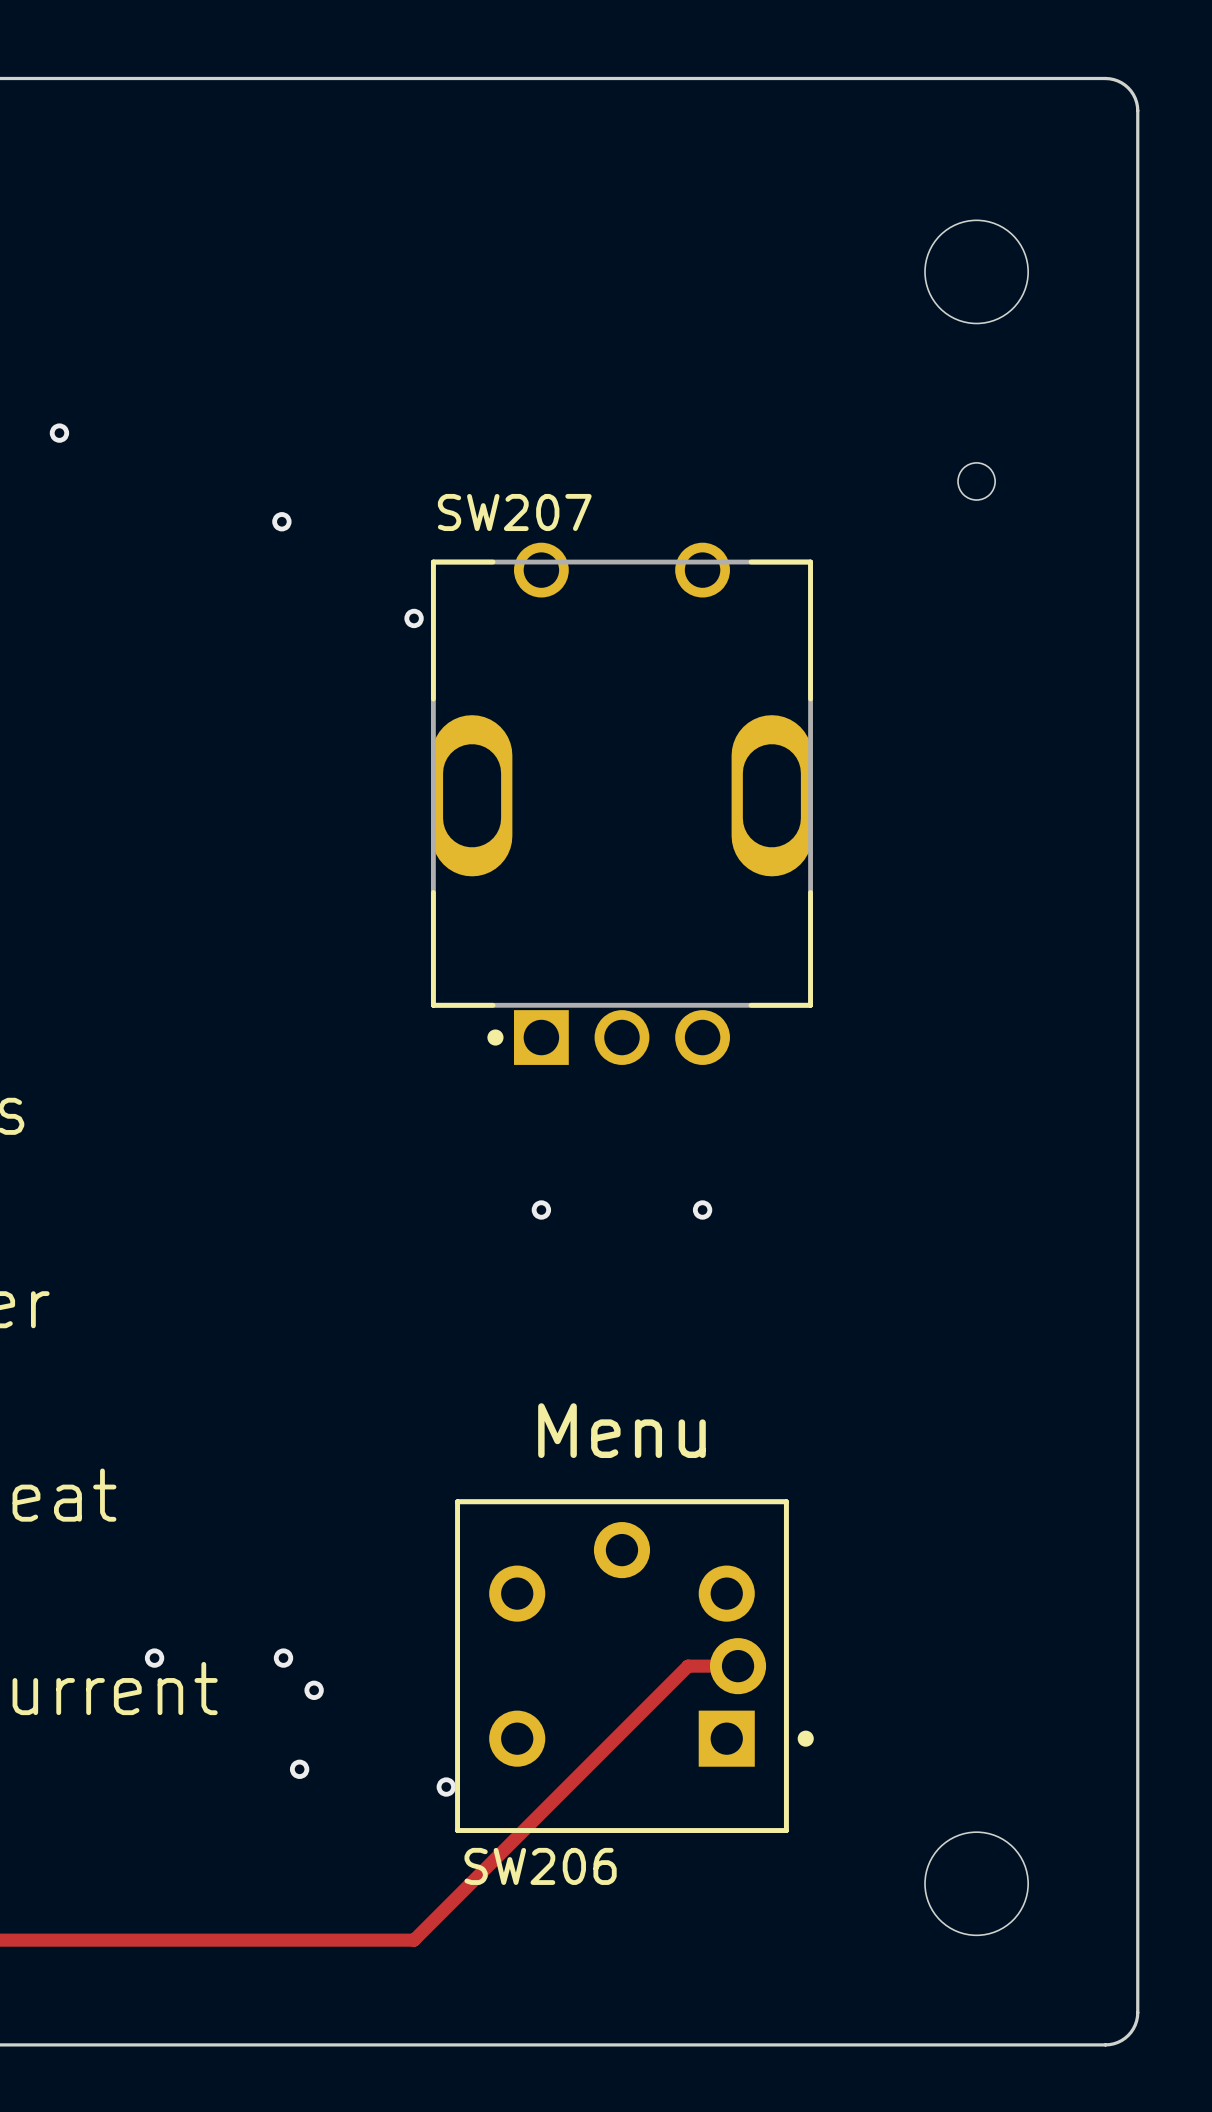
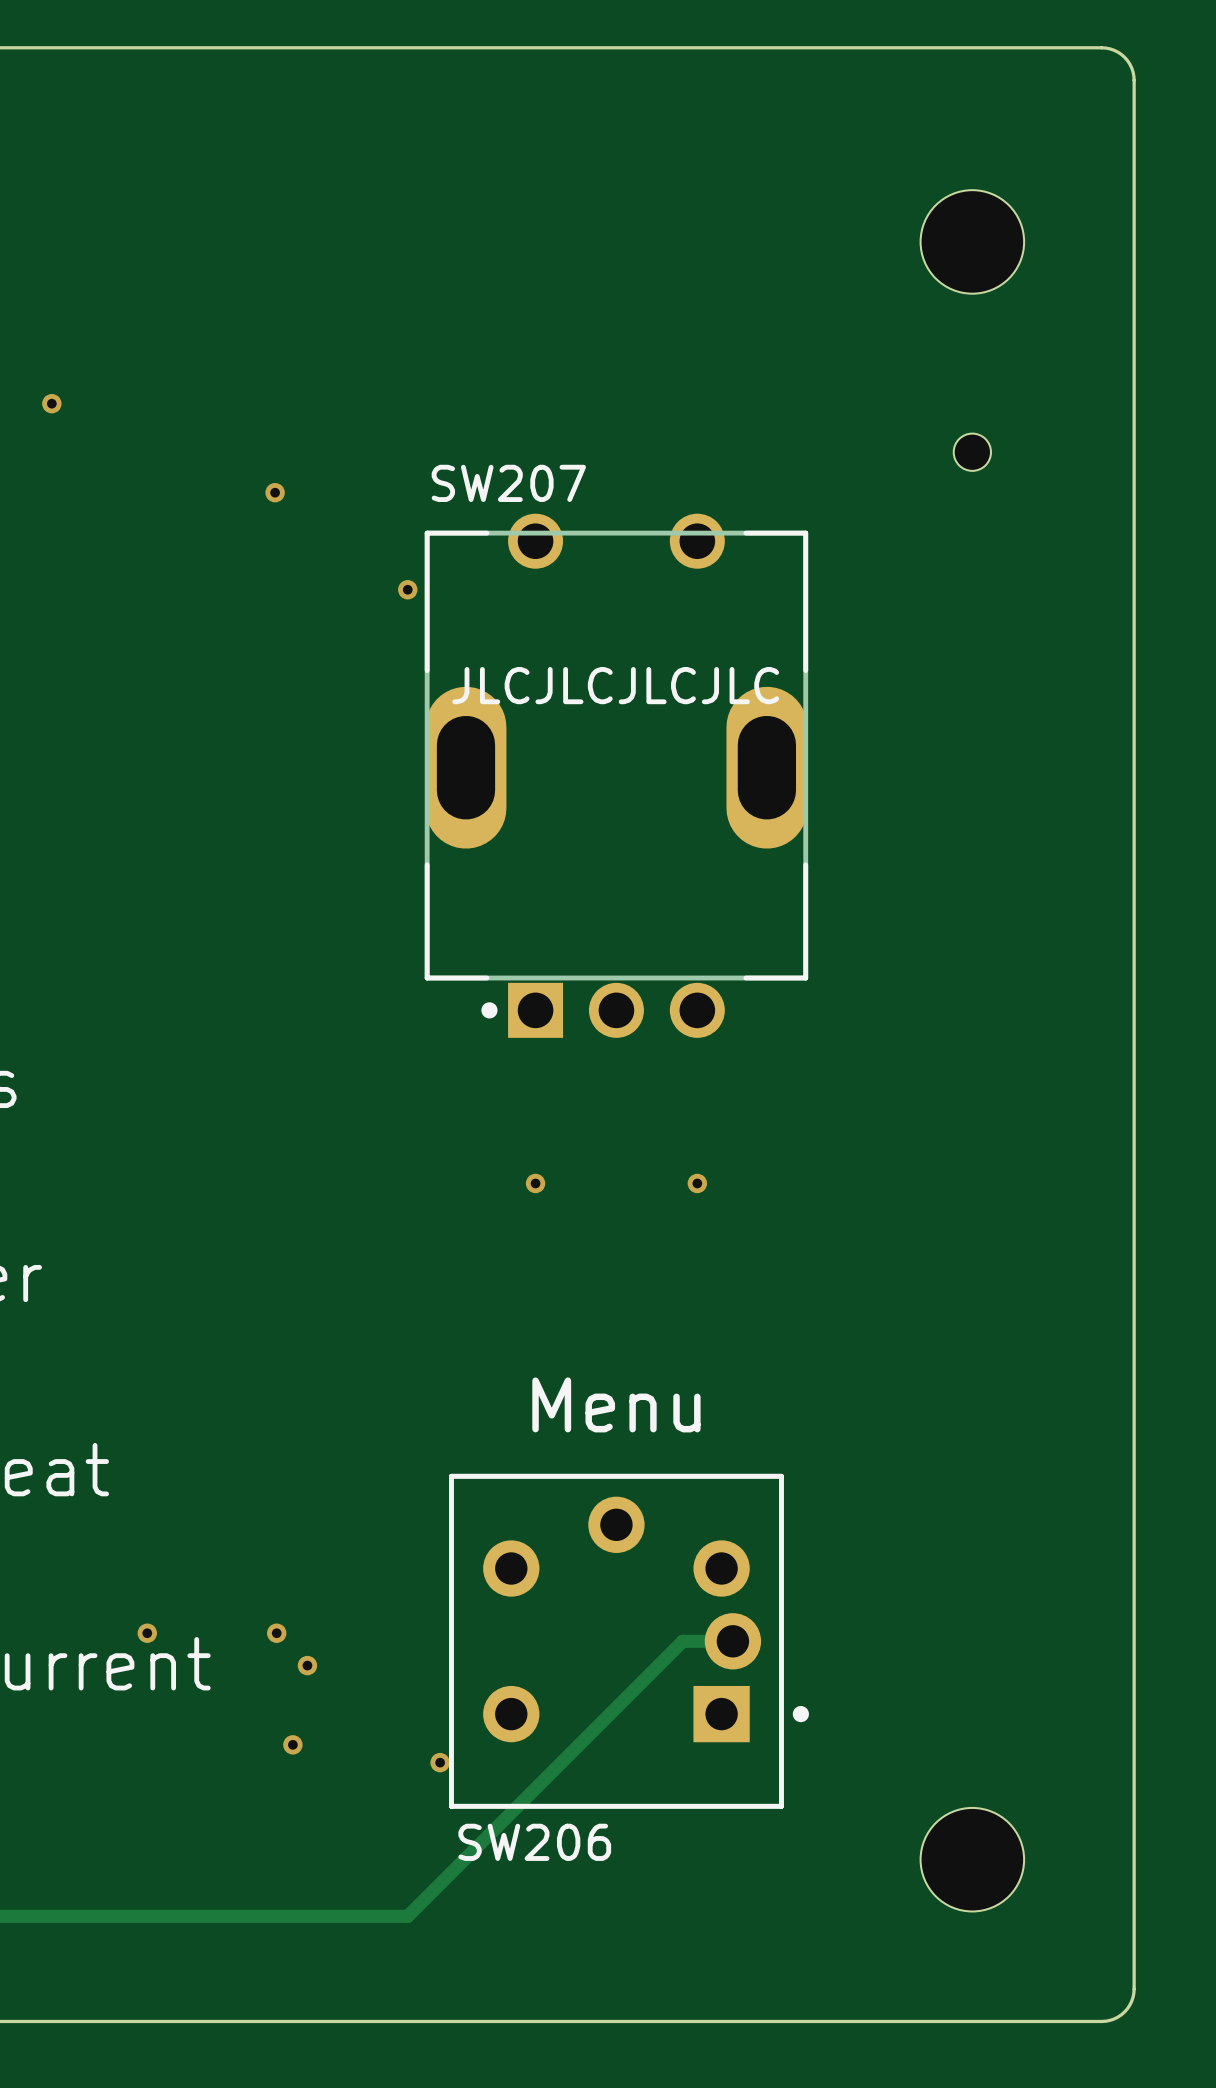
text: none -> JLCJLCJLCJLC (615, 685)

